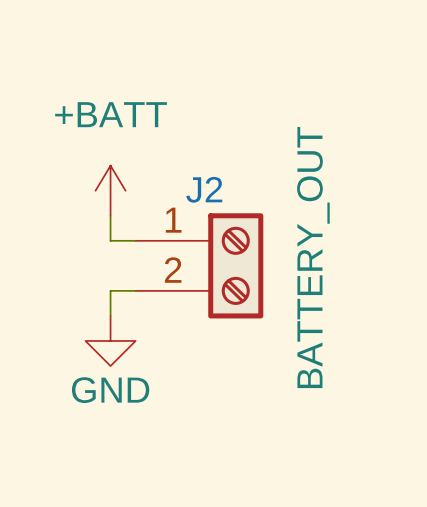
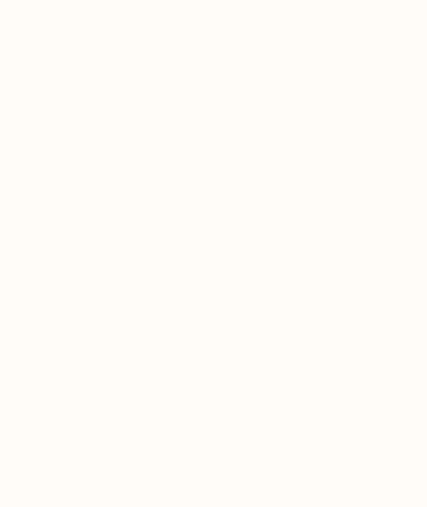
power symbol: +BATT (110, 190) -> none
wire: (110, 215) (110, 240) (135, 240) -> none
J2: BATTERY_OUT (199, 265) -> none
wire: (135, 290) (110, 290) (110, 315) -> none
power symbol: GND (110, 340) -> none

